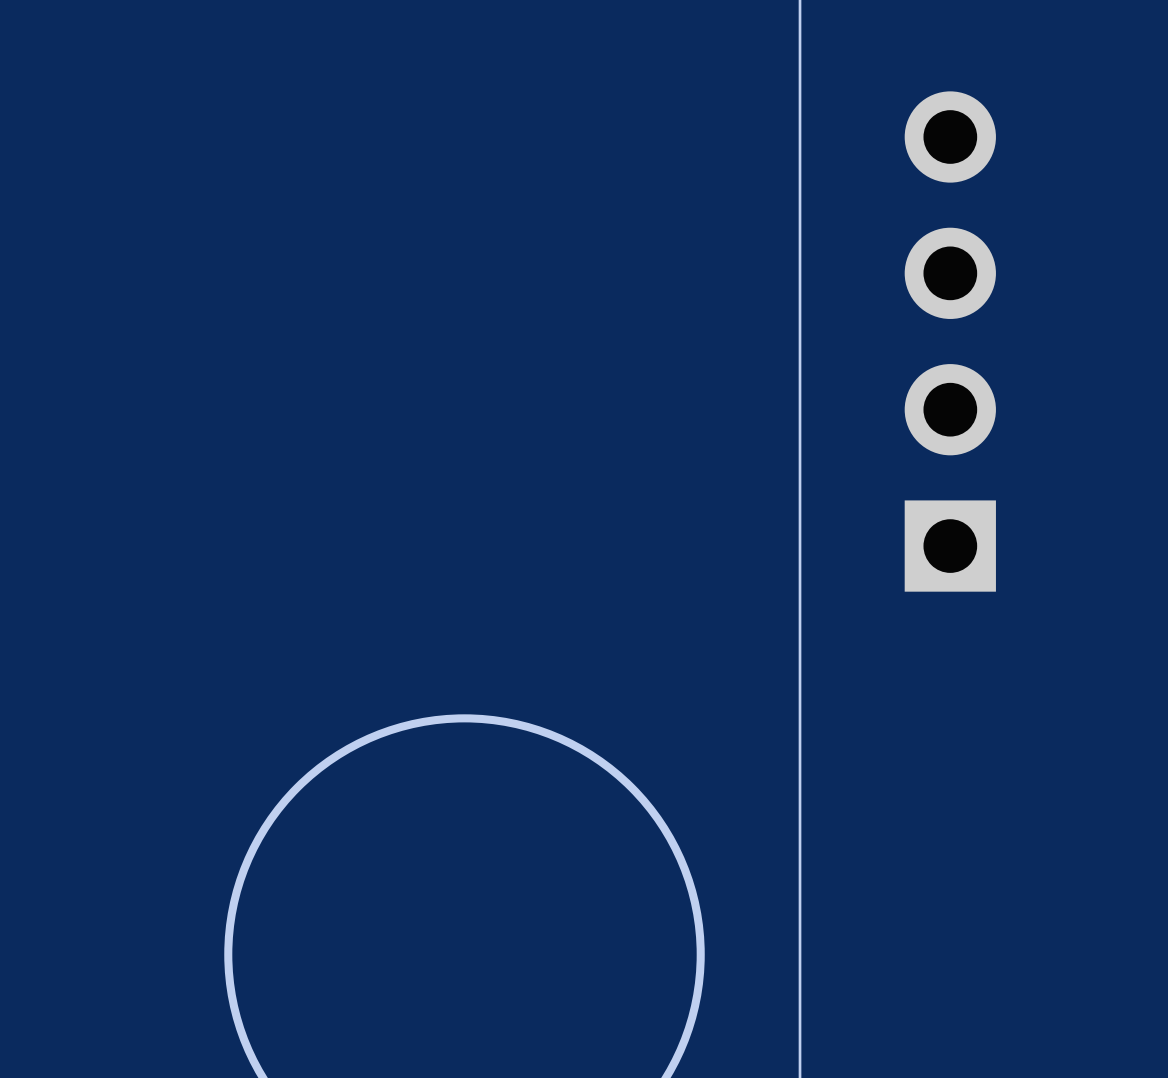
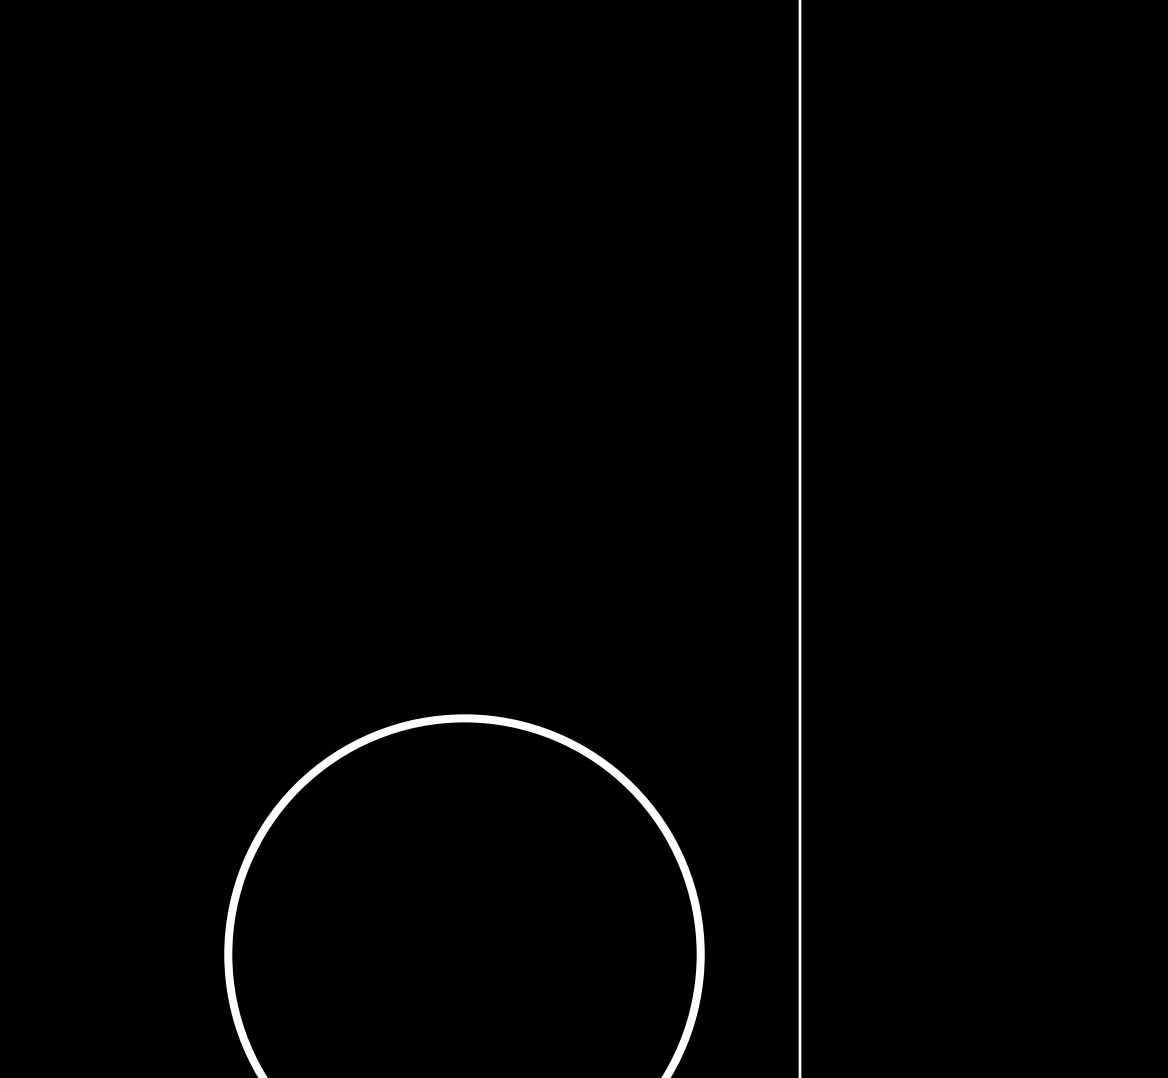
part: (950, 341) -> none

